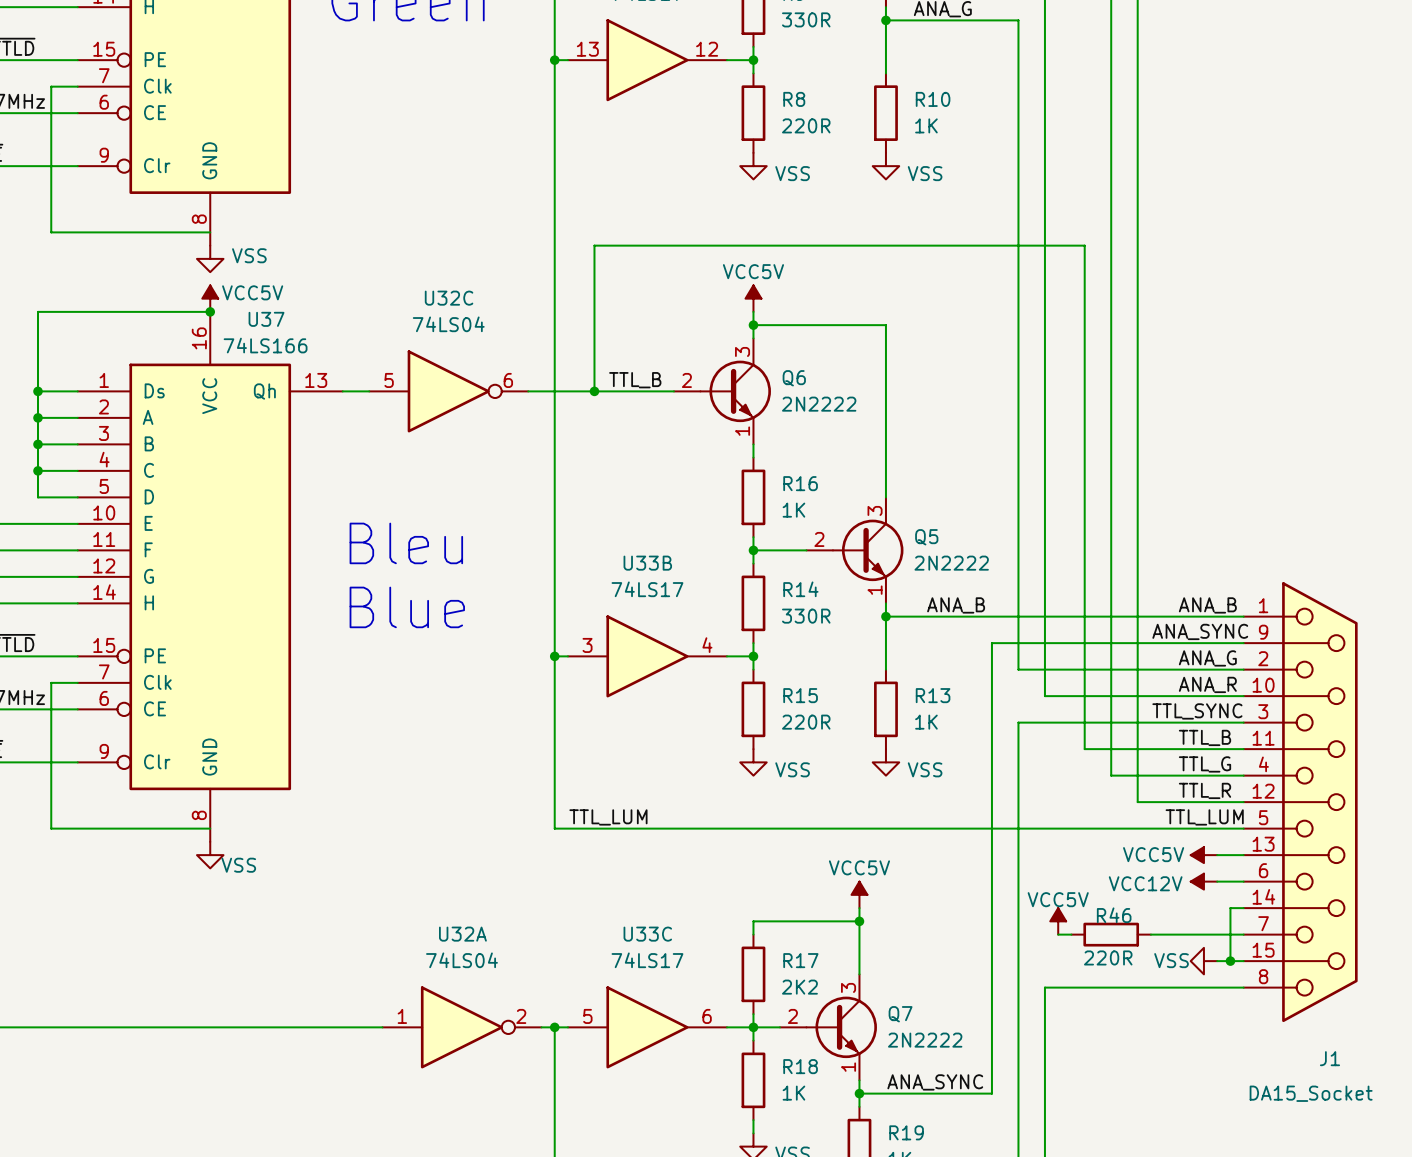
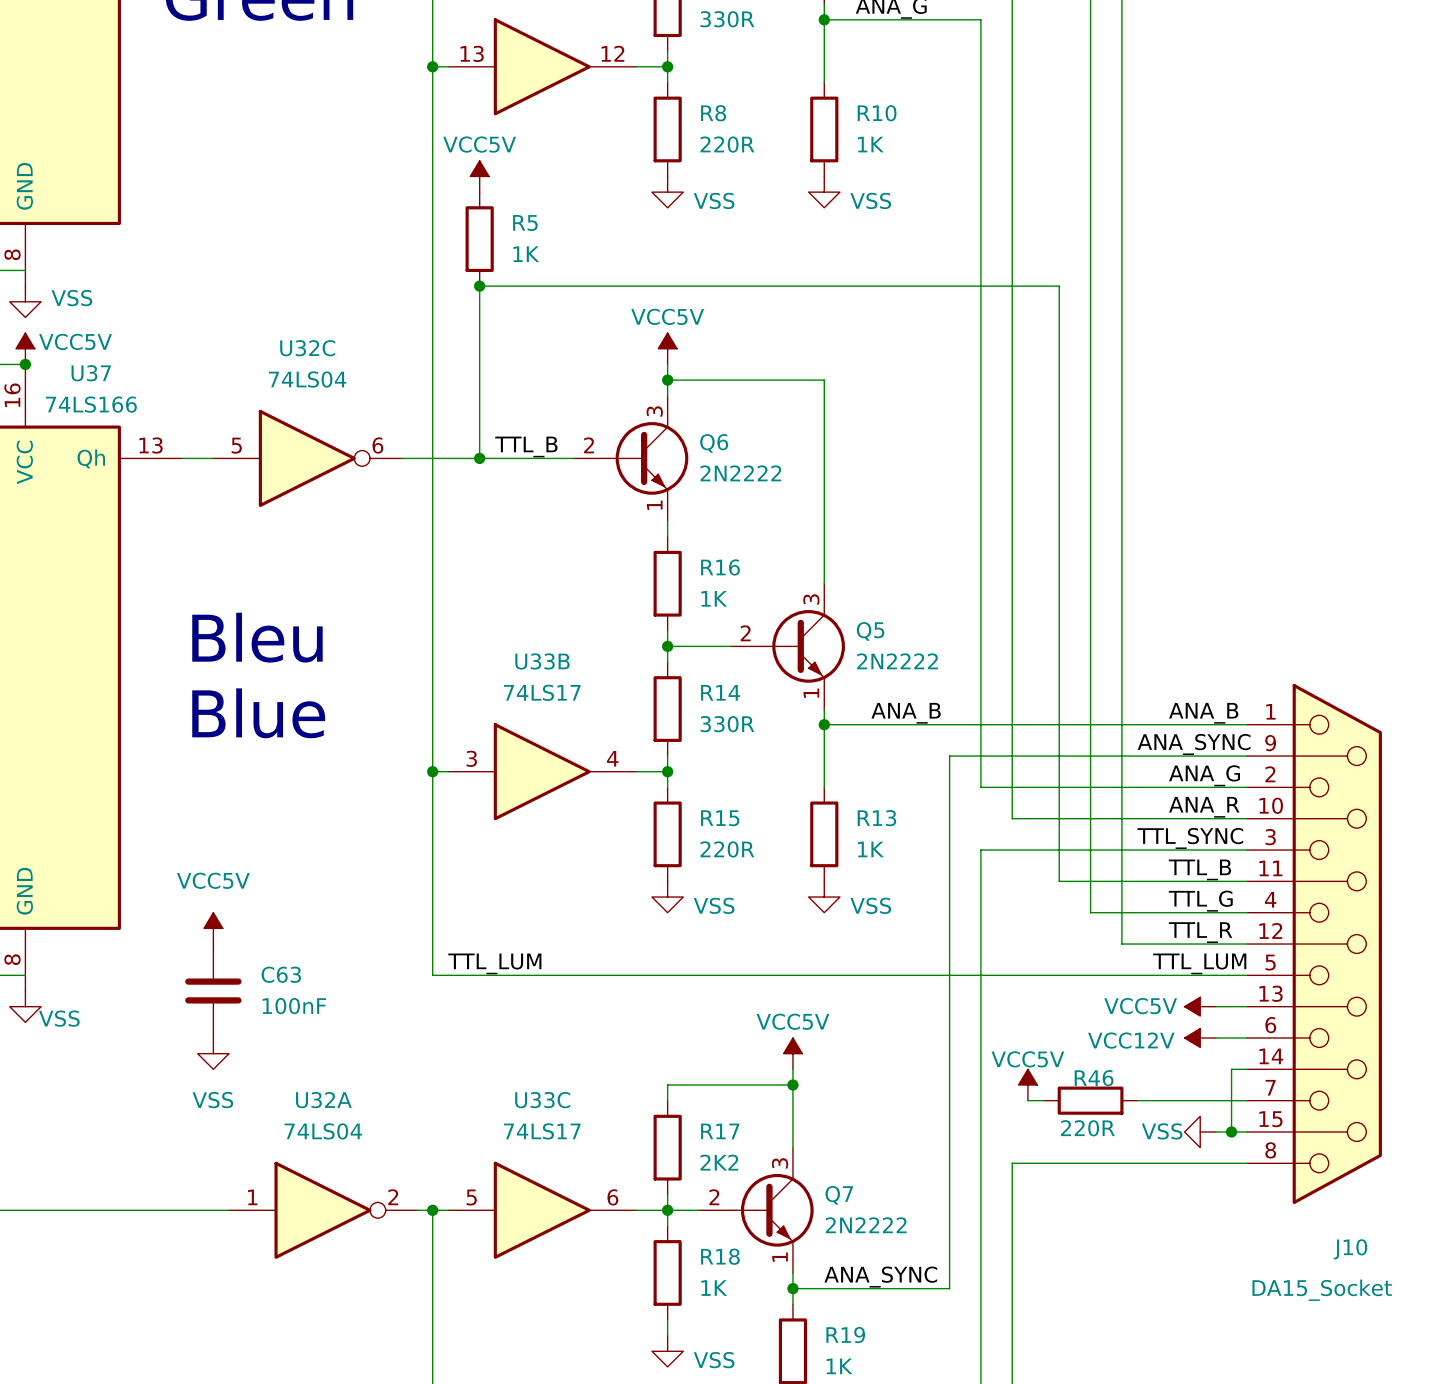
power symbol: none -> VCC5V (479, 176)
R5: none -> 1K (479, 239)
junction: none -> (479, 286)
power symbol: none -> VCC5V (213, 928)
C63: none -> 100nF (213, 991)
power symbol: none -> VSS (213, 1053)
J1 name: J1 (1329, 1058) -> J10 (1350, 1249)

